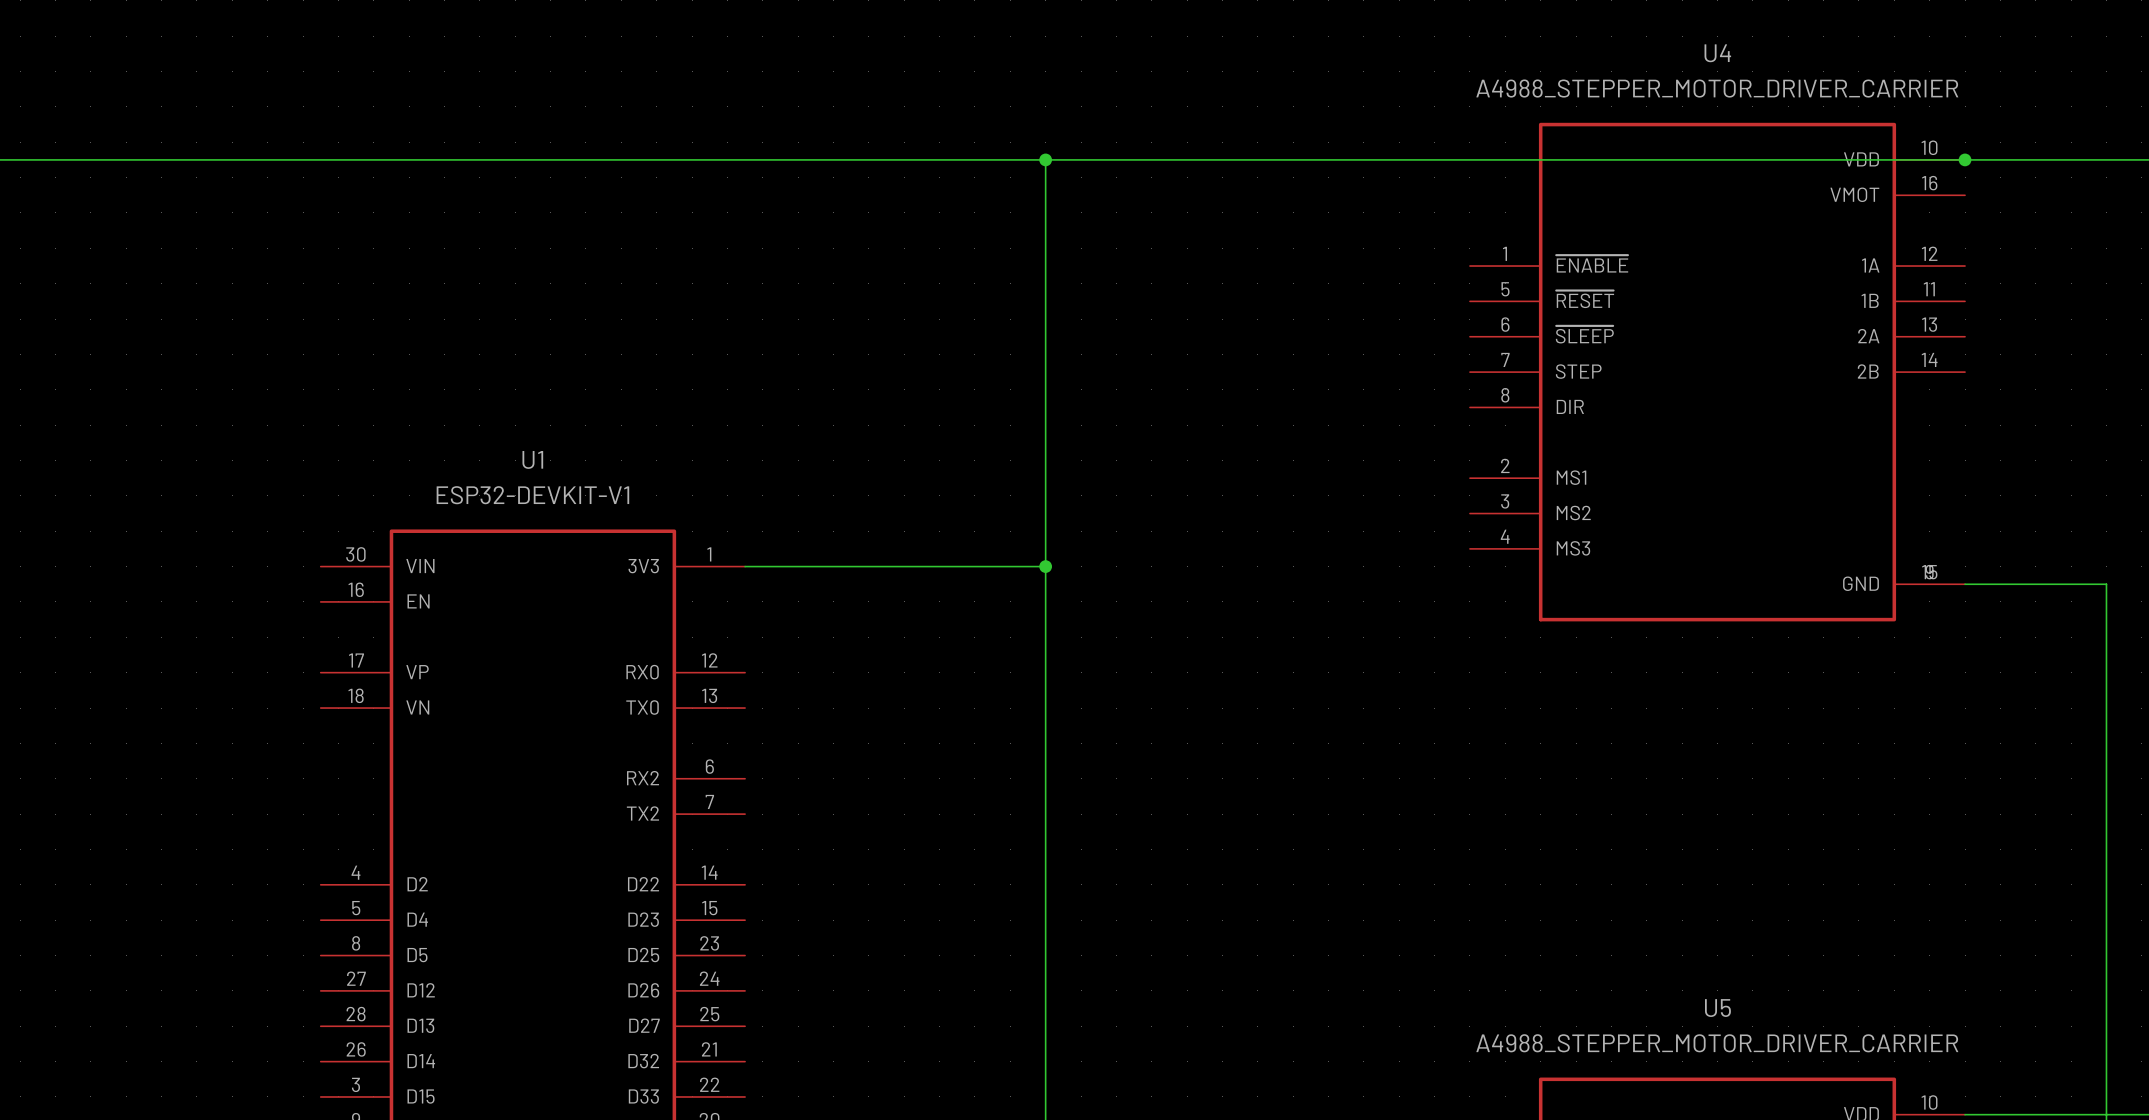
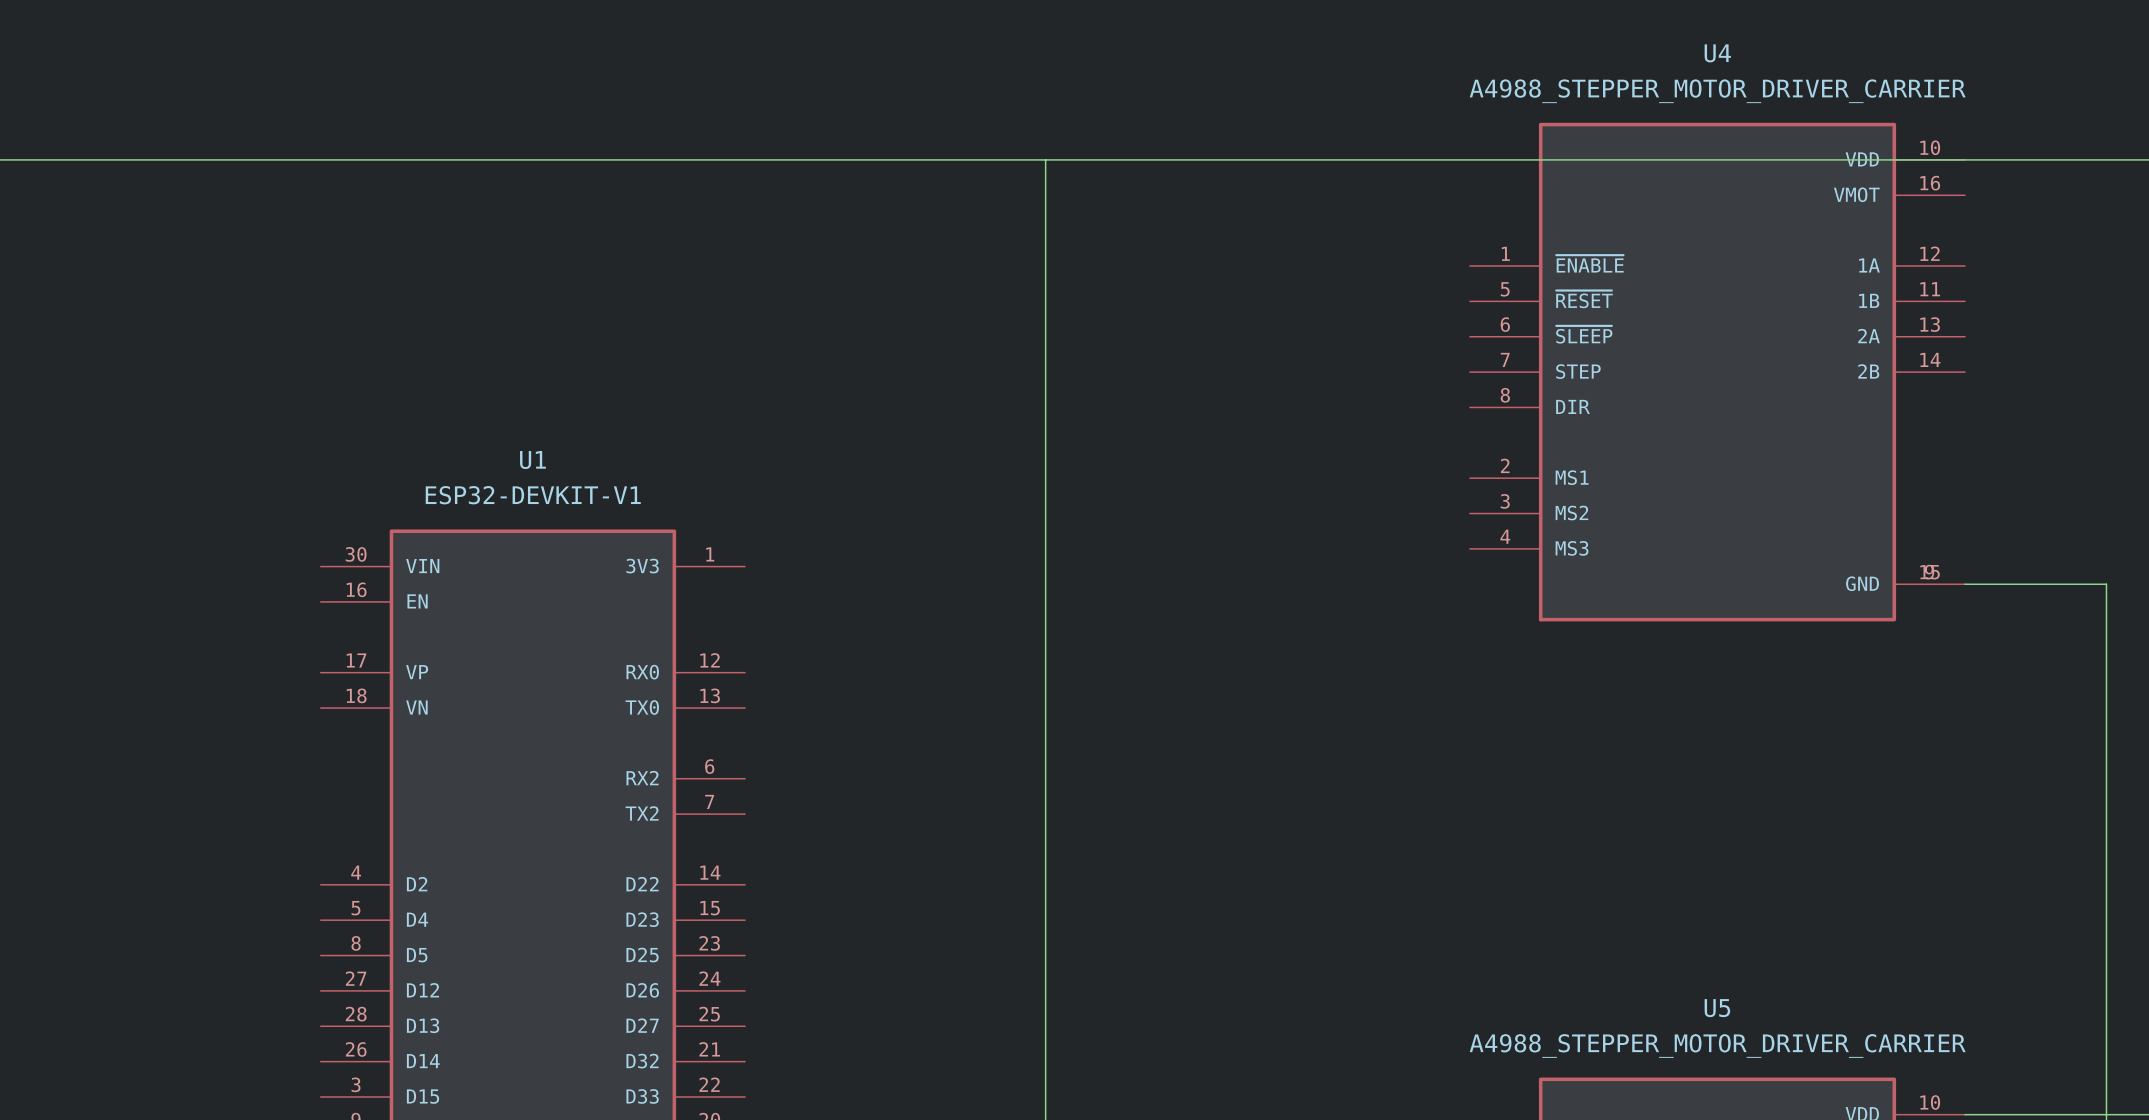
junction: (1045, 159) -> none
junction: (1965, 159) -> none
wire: (745, 566) (1045, 566) -> none
junction: (1045, 566) -> none

